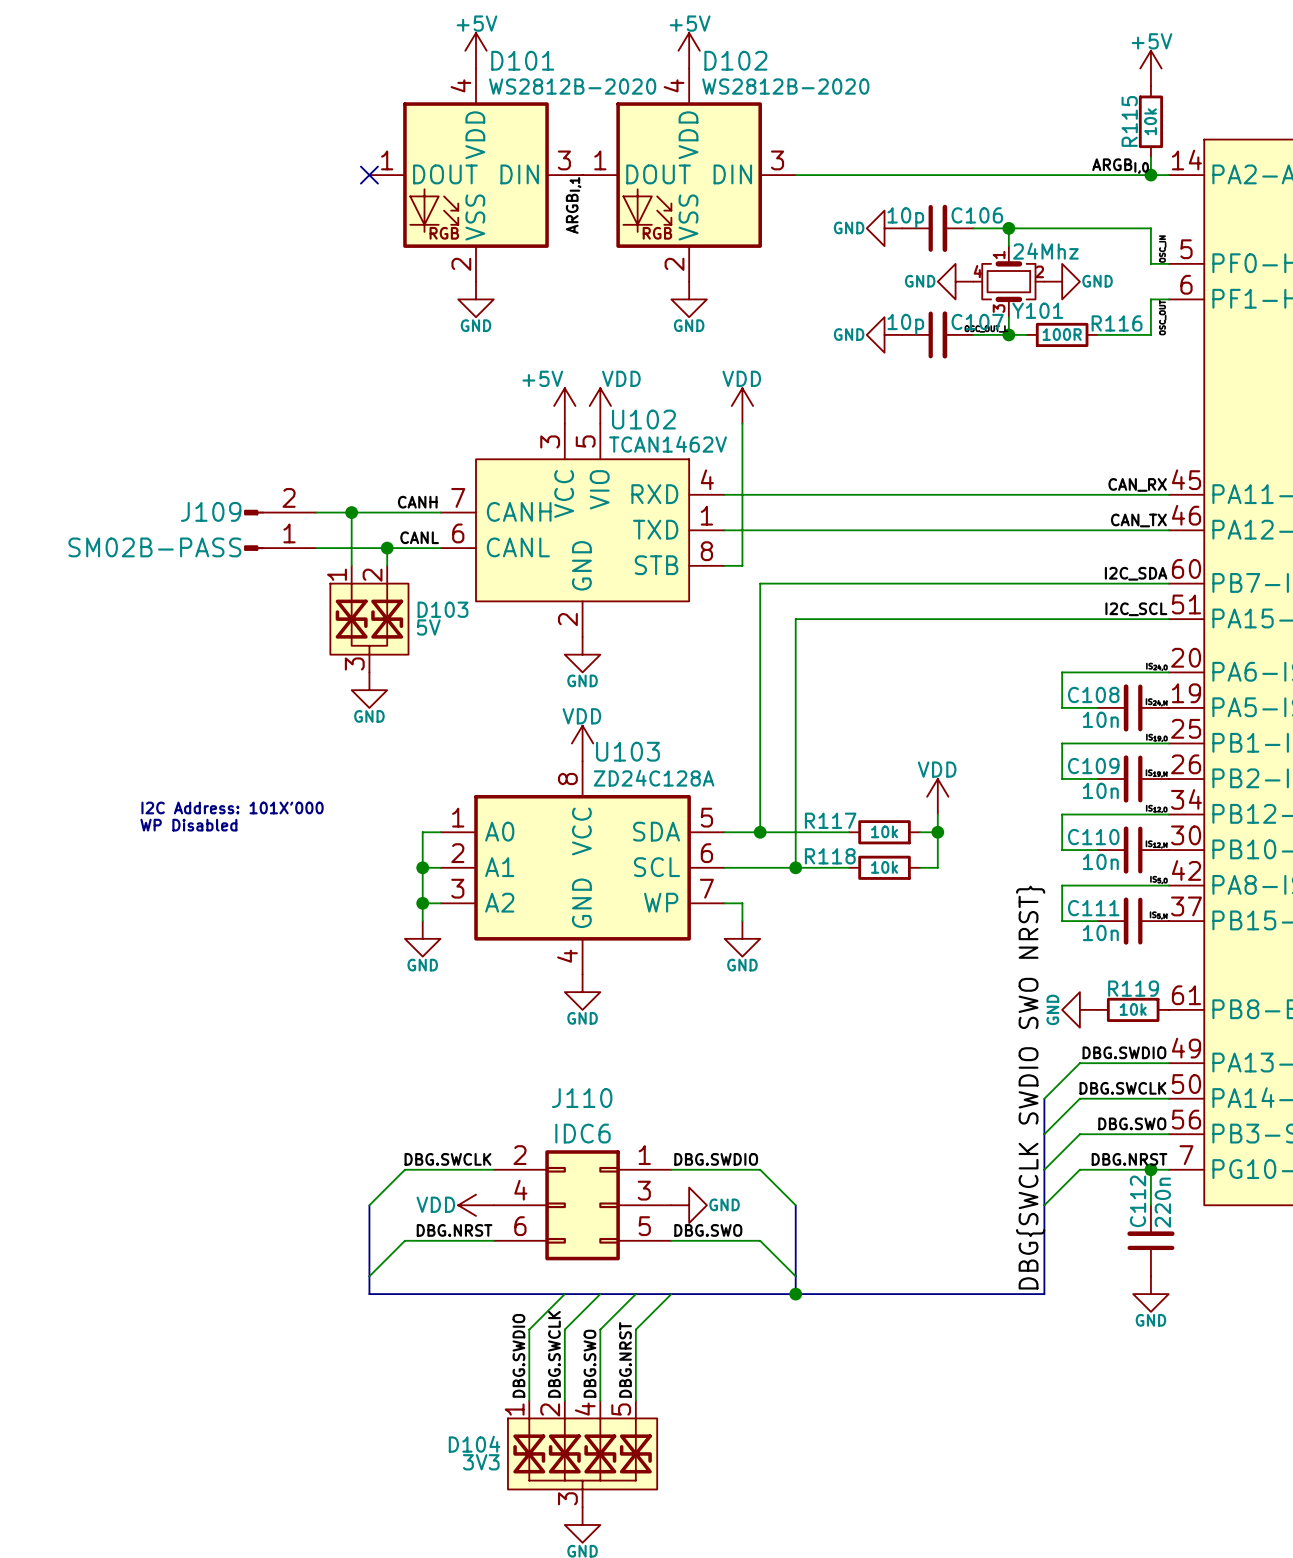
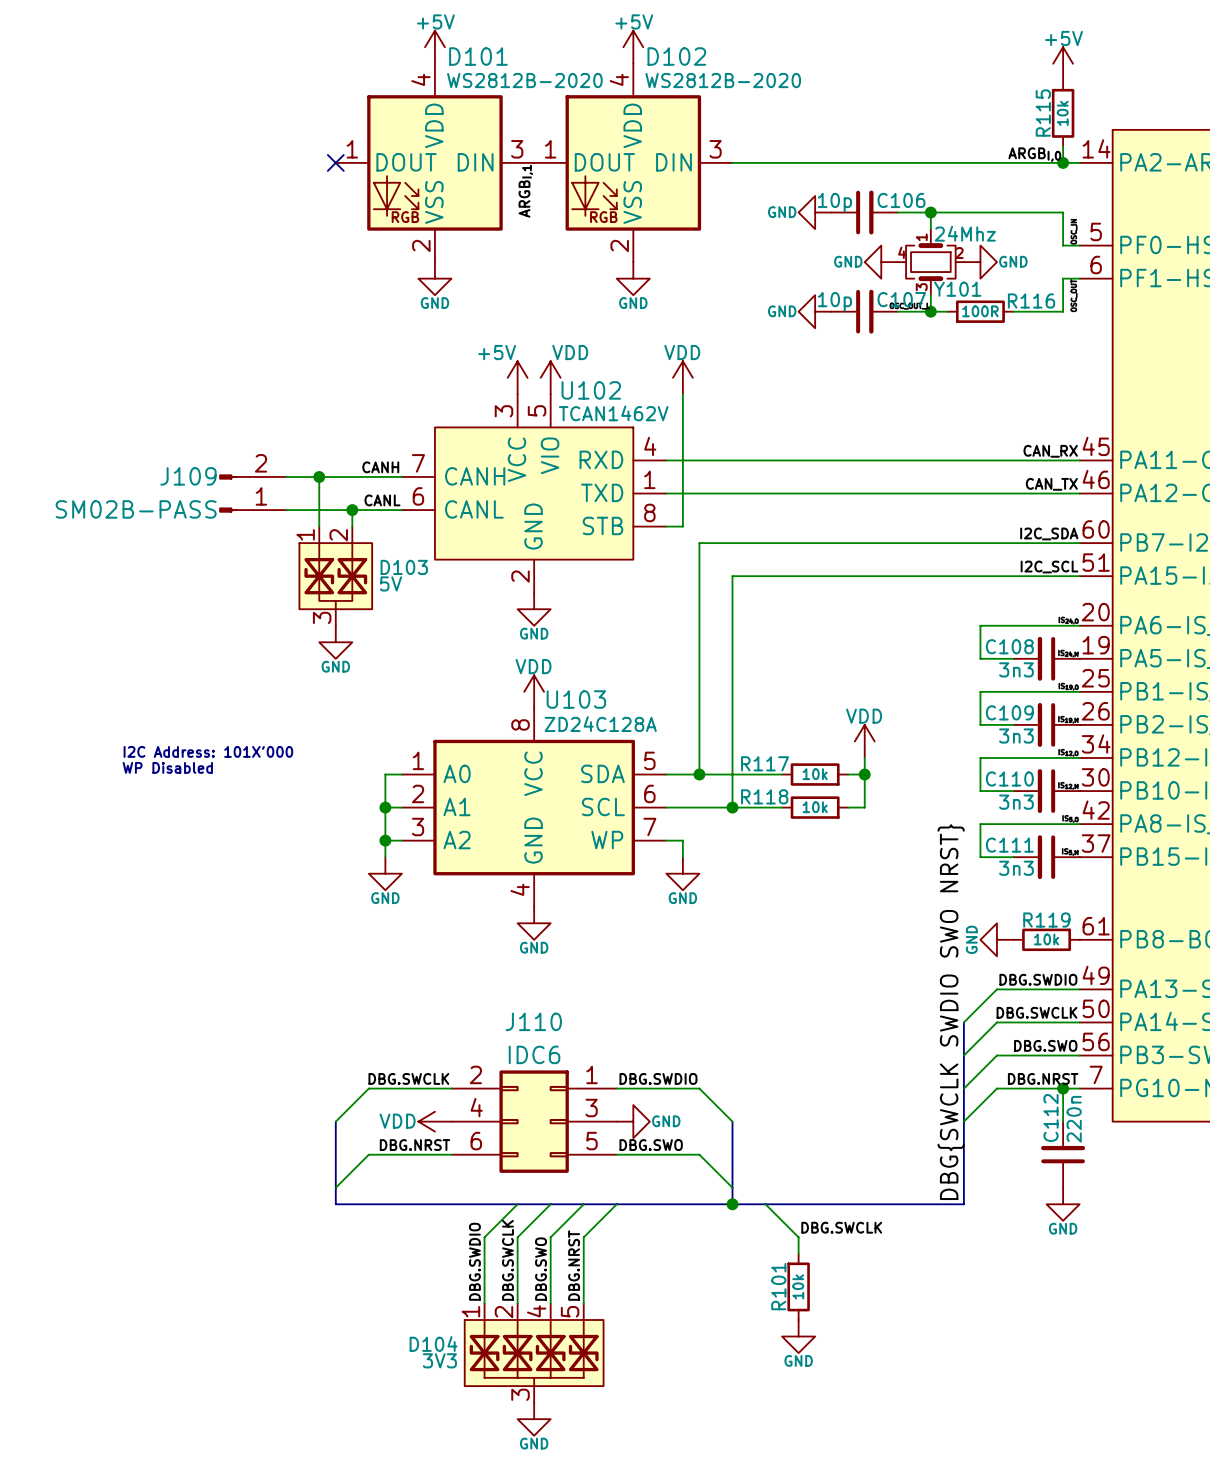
C108 value: 10n (1100, 719) -> 3n3 (1016, 669)
C109 value: 10n (1100, 790) -> 3n3 (1016, 736)
C110 value: 10n (1100, 861) -> 3n3 (1016, 802)
C111 value: 10n (1100, 932) -> 3n3 (1016, 868)
wire: none -> (765, 1204) (798, 1237) (798, 1253)
label: none -> DBG.SWCLK (841, 1227)
R101: none -> 10k (798, 1286)
power symbol: none -> GND (798, 1336)

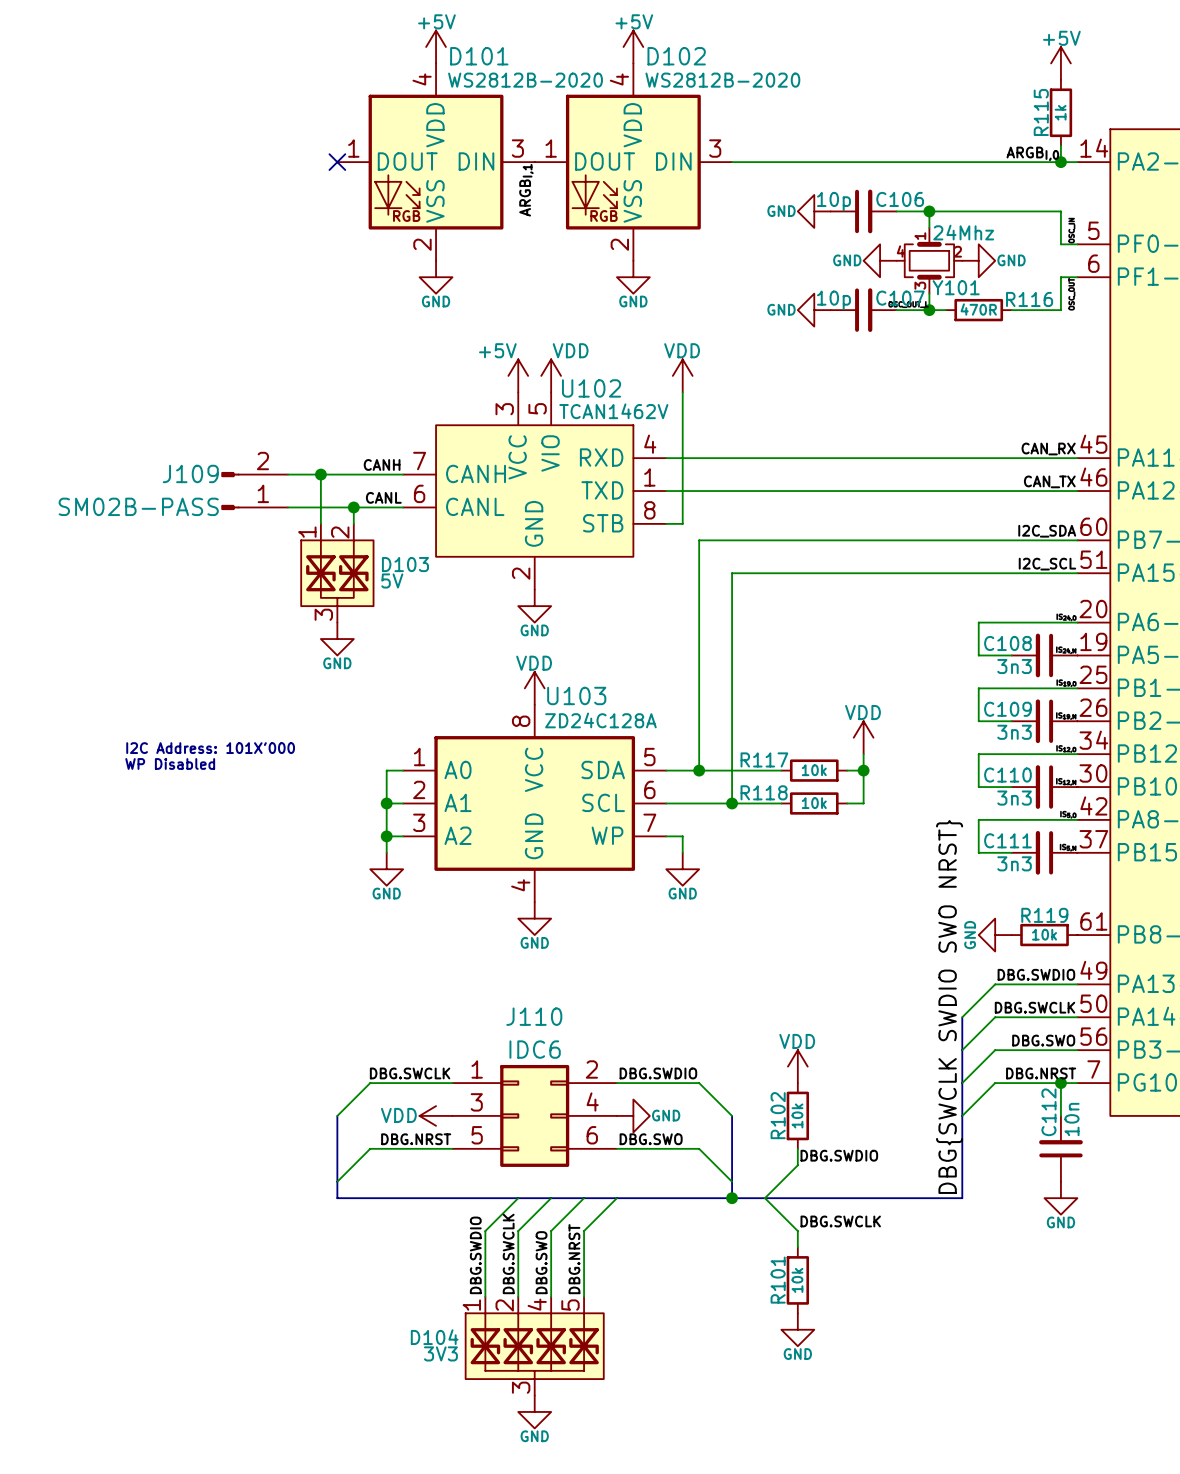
R115 value: 10k (1062, 113) -> 1k (1060, 112)
R116 value: 100R (980, 311) -> 470R (978, 309)
power symbol: none -> VDD (797, 1066)
C112 value: 220n (1074, 1119) -> 10n (1071, 1119)
J110 flip: as is (534, 1121) -> left-right (534, 1115)
R102: none -> 10k (797, 1115)
wire: none -> (797, 1148) (797, 1165) (764, 1198)
label: none -> DBG.SWDIO (839, 1155)

